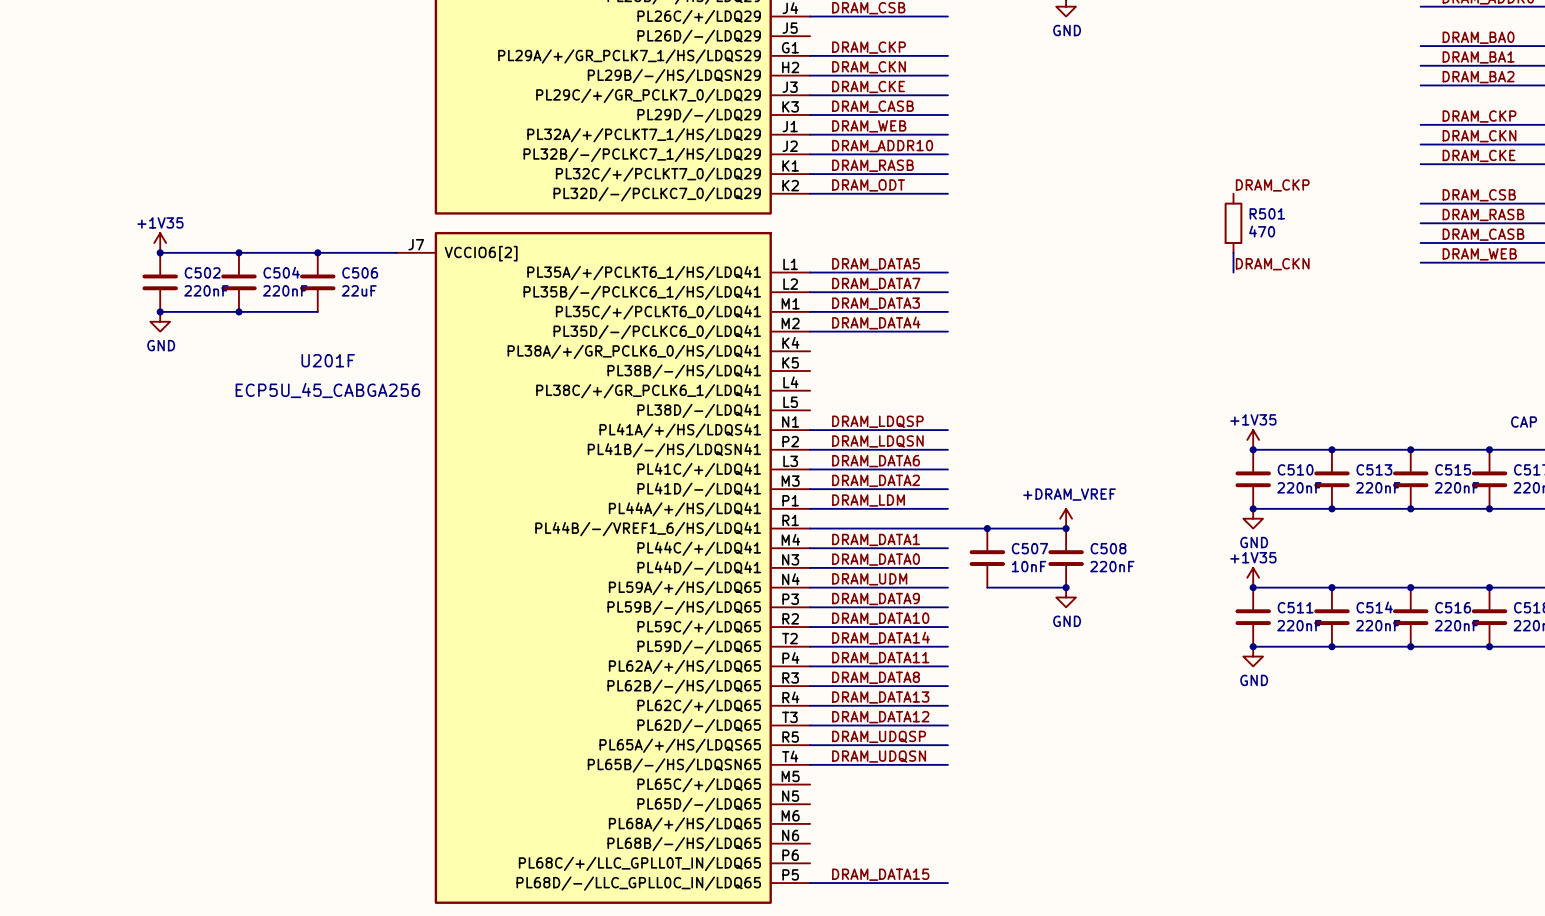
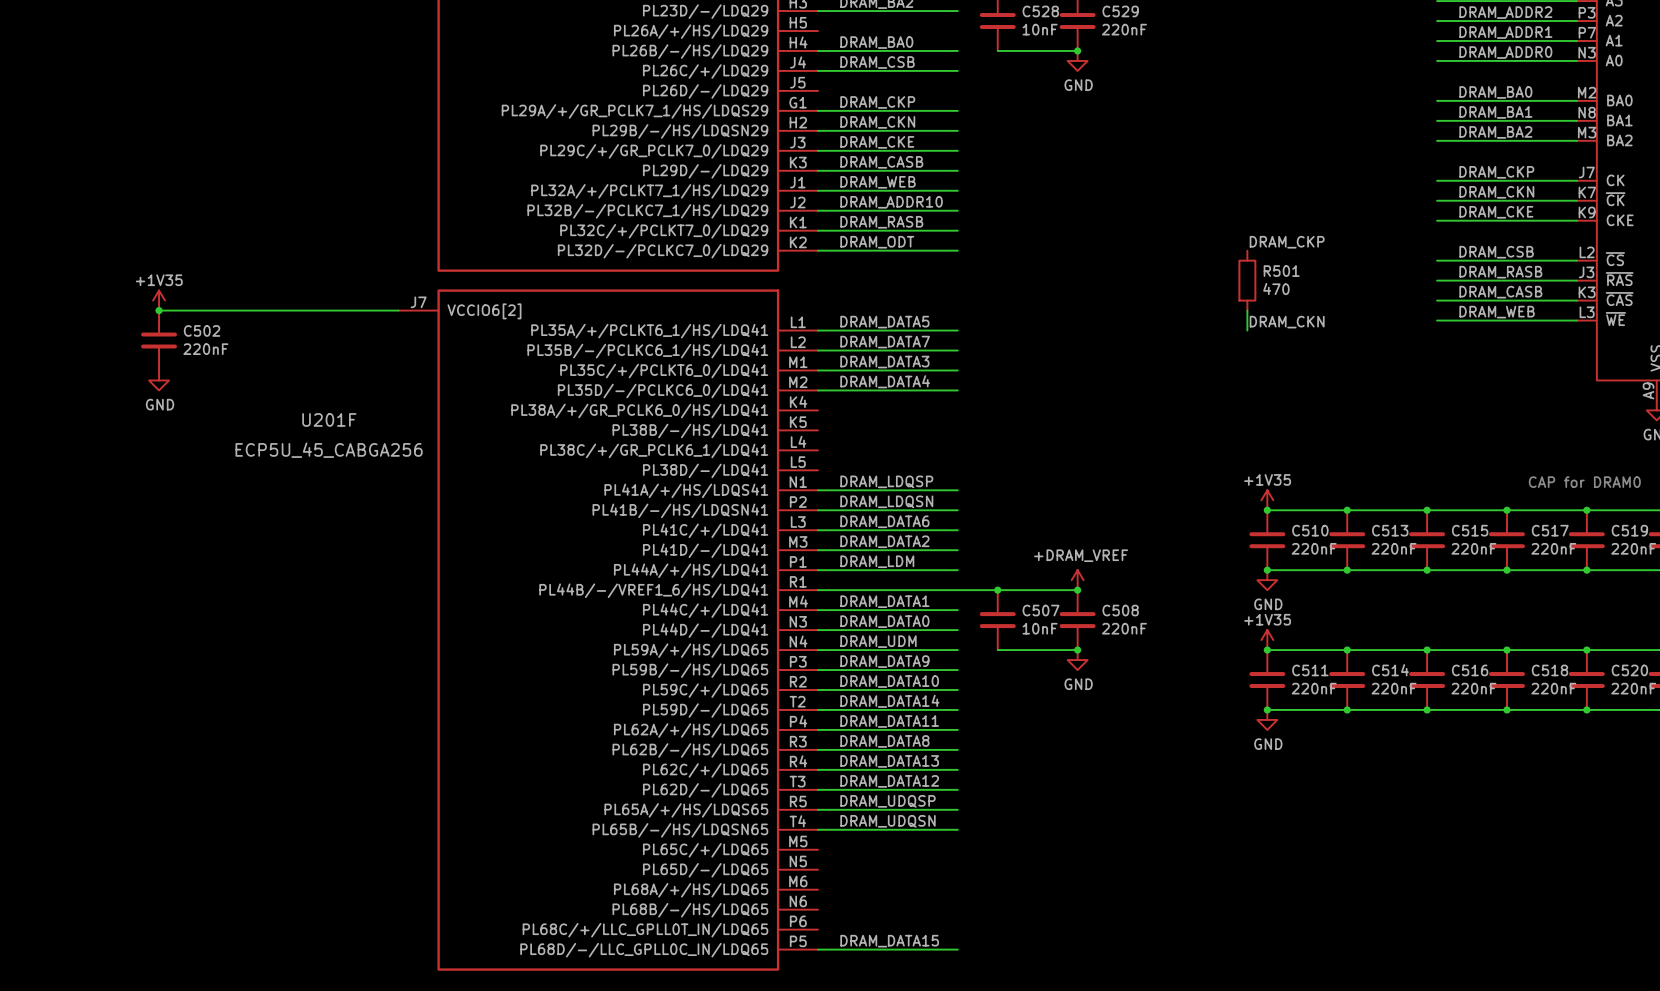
junction: (238, 252) -> none
junction: (317, 252) -> none
C504: 220nF (238, 282) -> none
C506: 22uF (317, 282) -> none
wire: (160, 311) (317, 311) -> none
junction: (160, 311) -> none
junction: (238, 311) -> none

